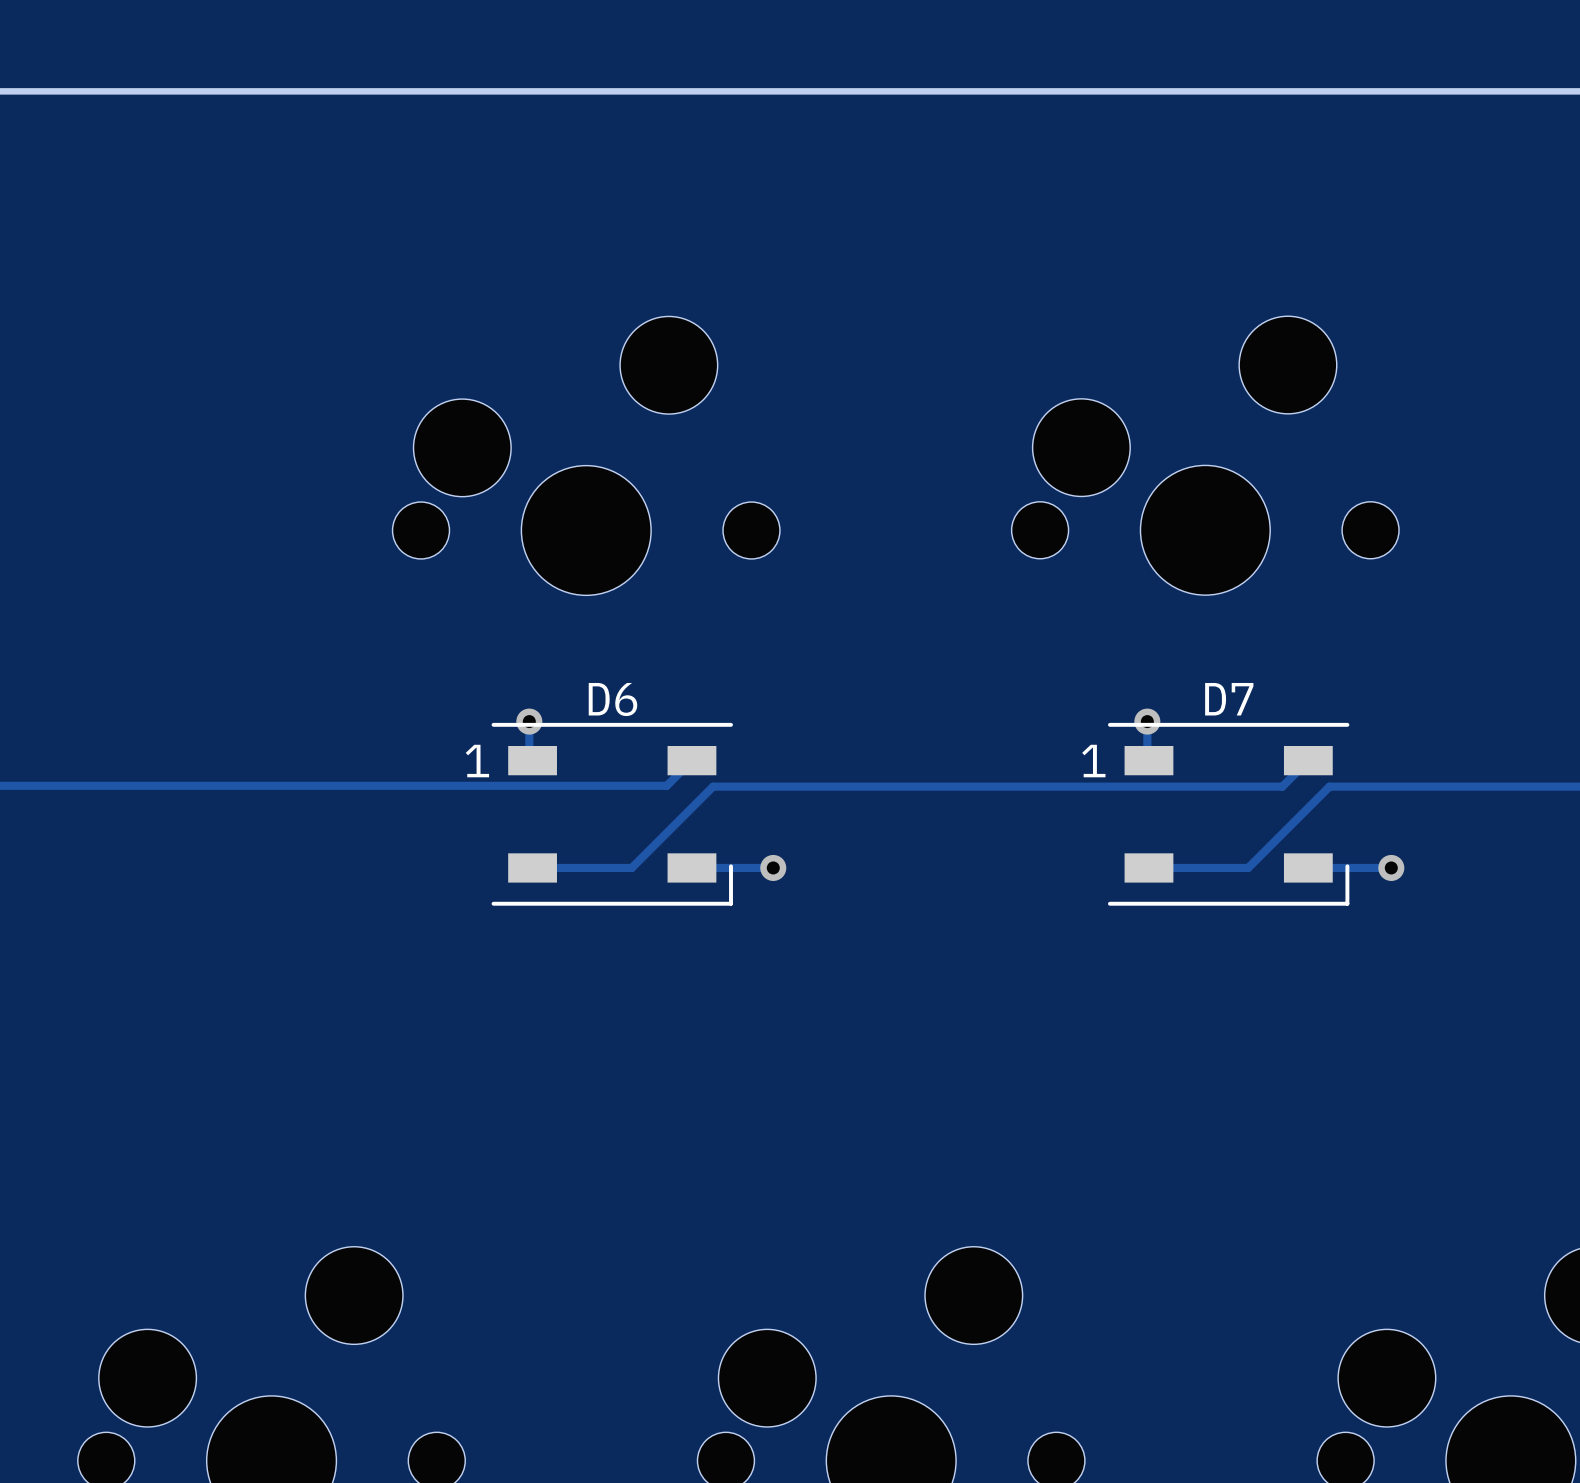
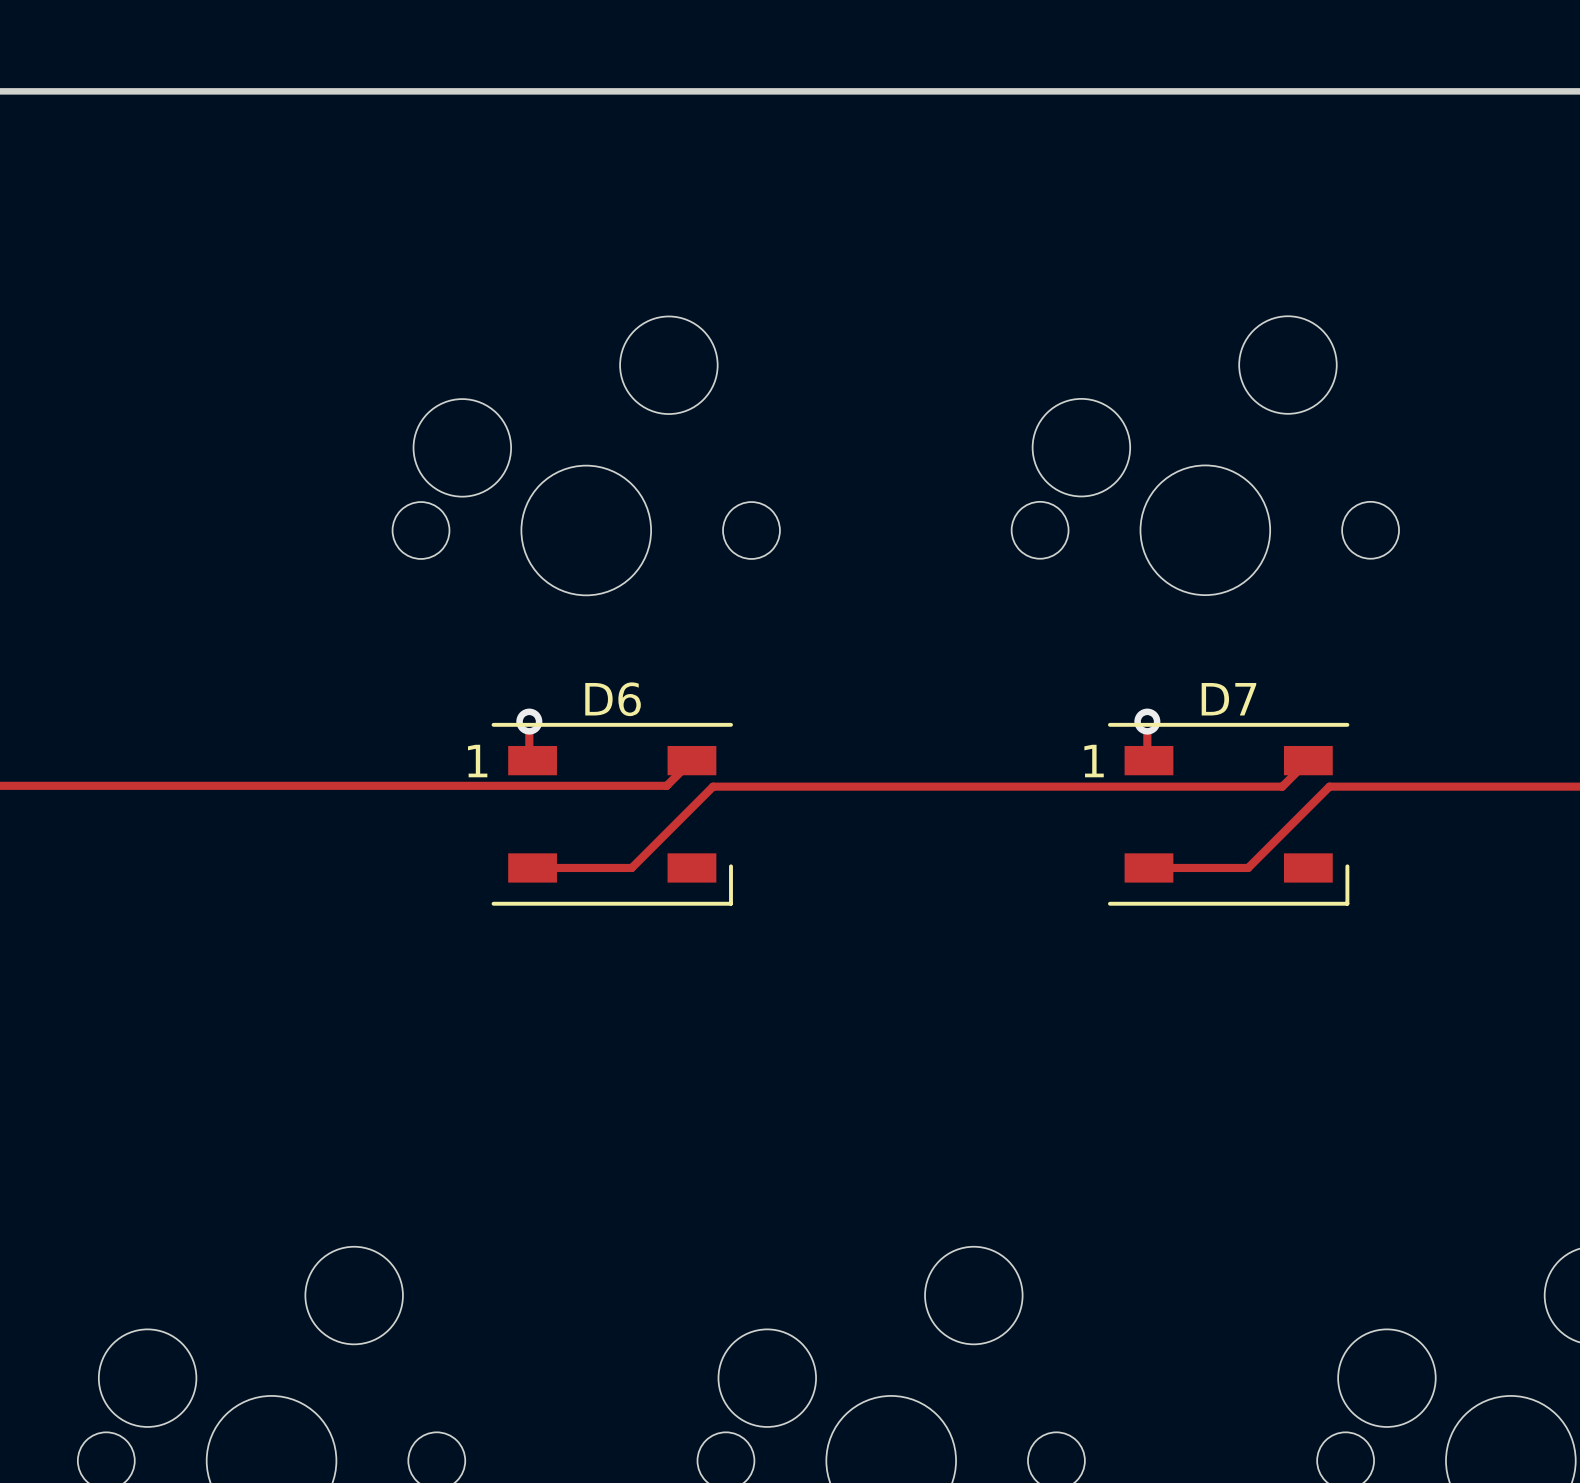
track: (691, 867) (773, 867) -> none
via: (773, 867) -> none
track: (1308, 867) (1391, 867) -> none
via: (1391, 867) -> none

